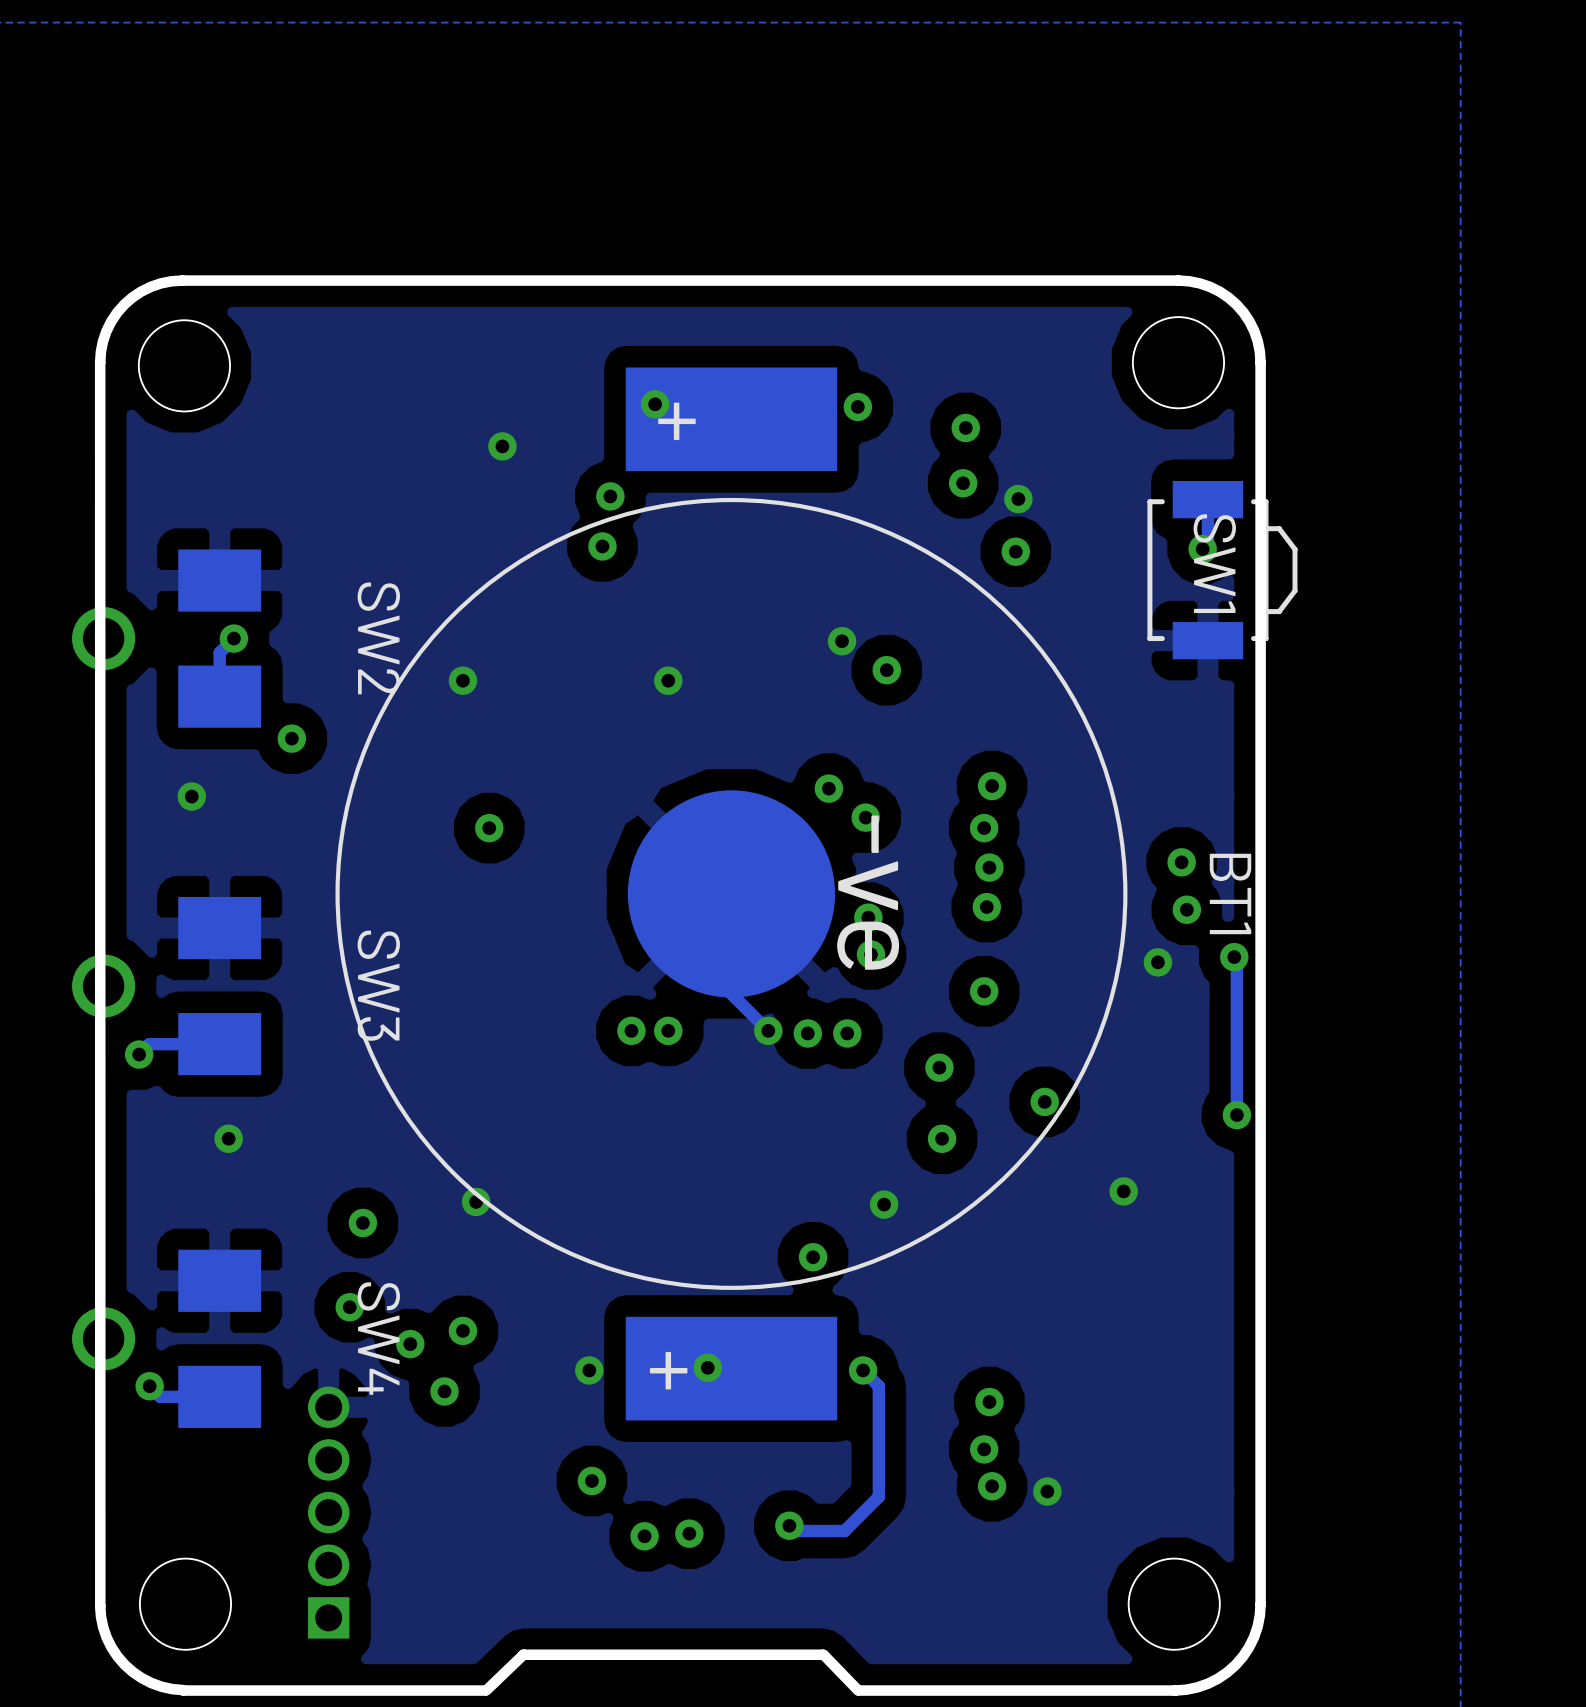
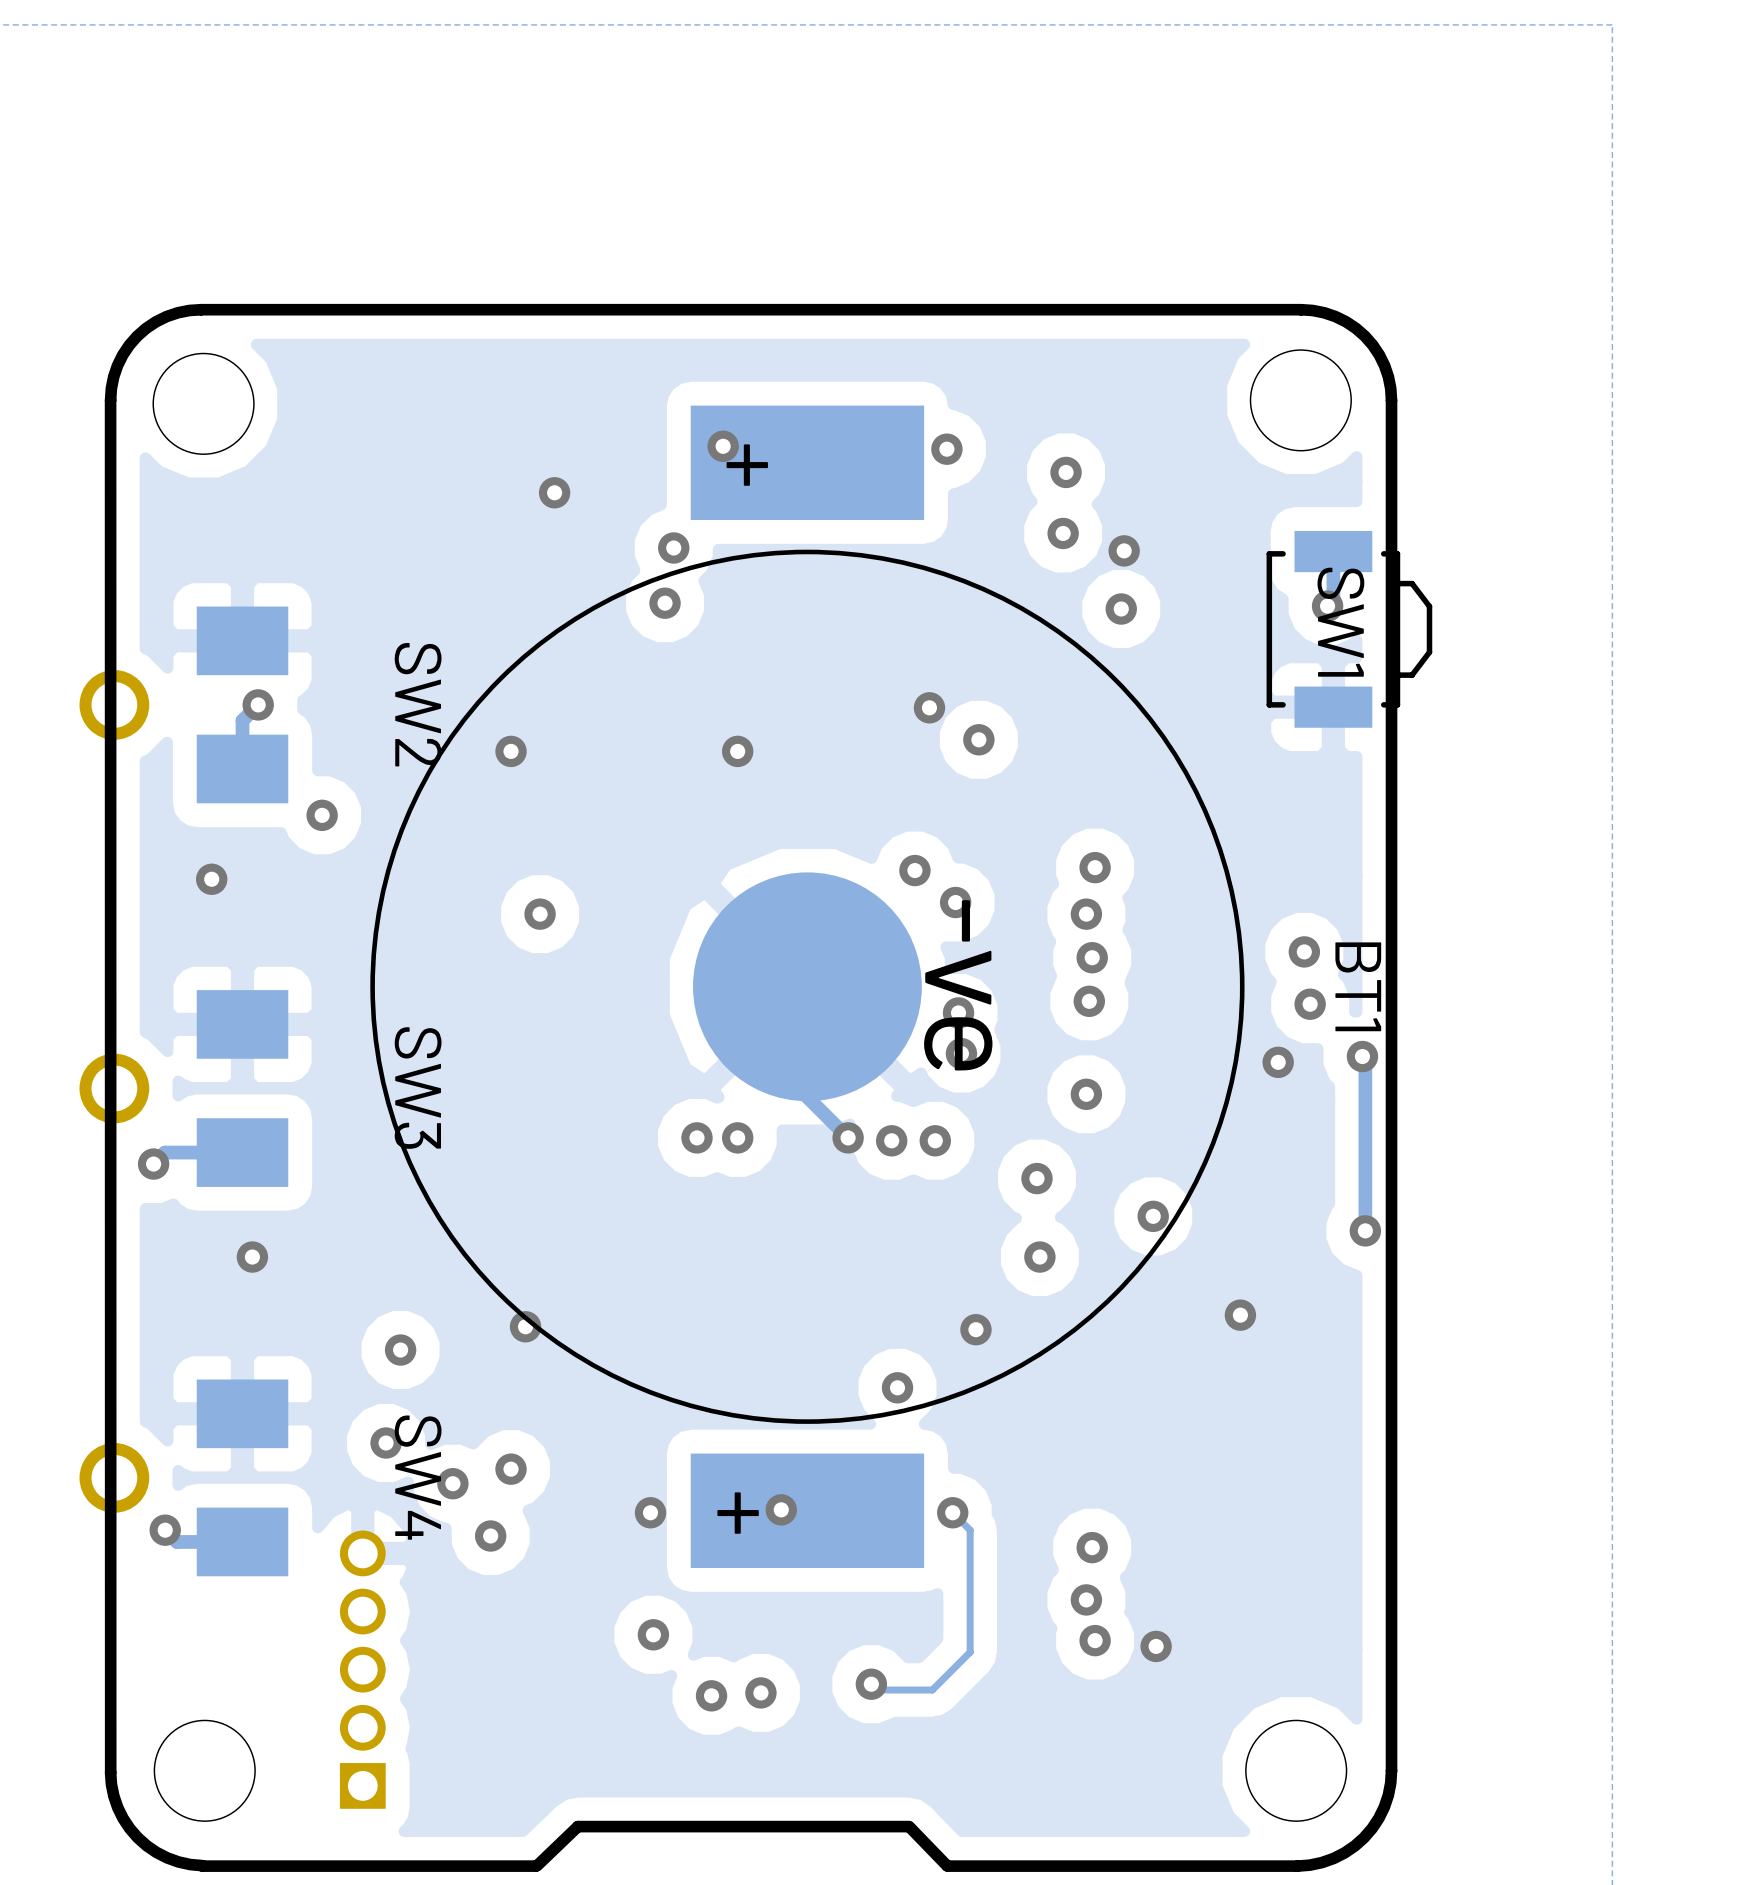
track width: thick (863, 1370) (878, 1386) (878, 1496) (844, 1531) (794, 1531) (789, 1525) -> thin (952, 1512) (970, 1530) (970, 1652) (932, 1690) (877, 1690) (871, 1684)

